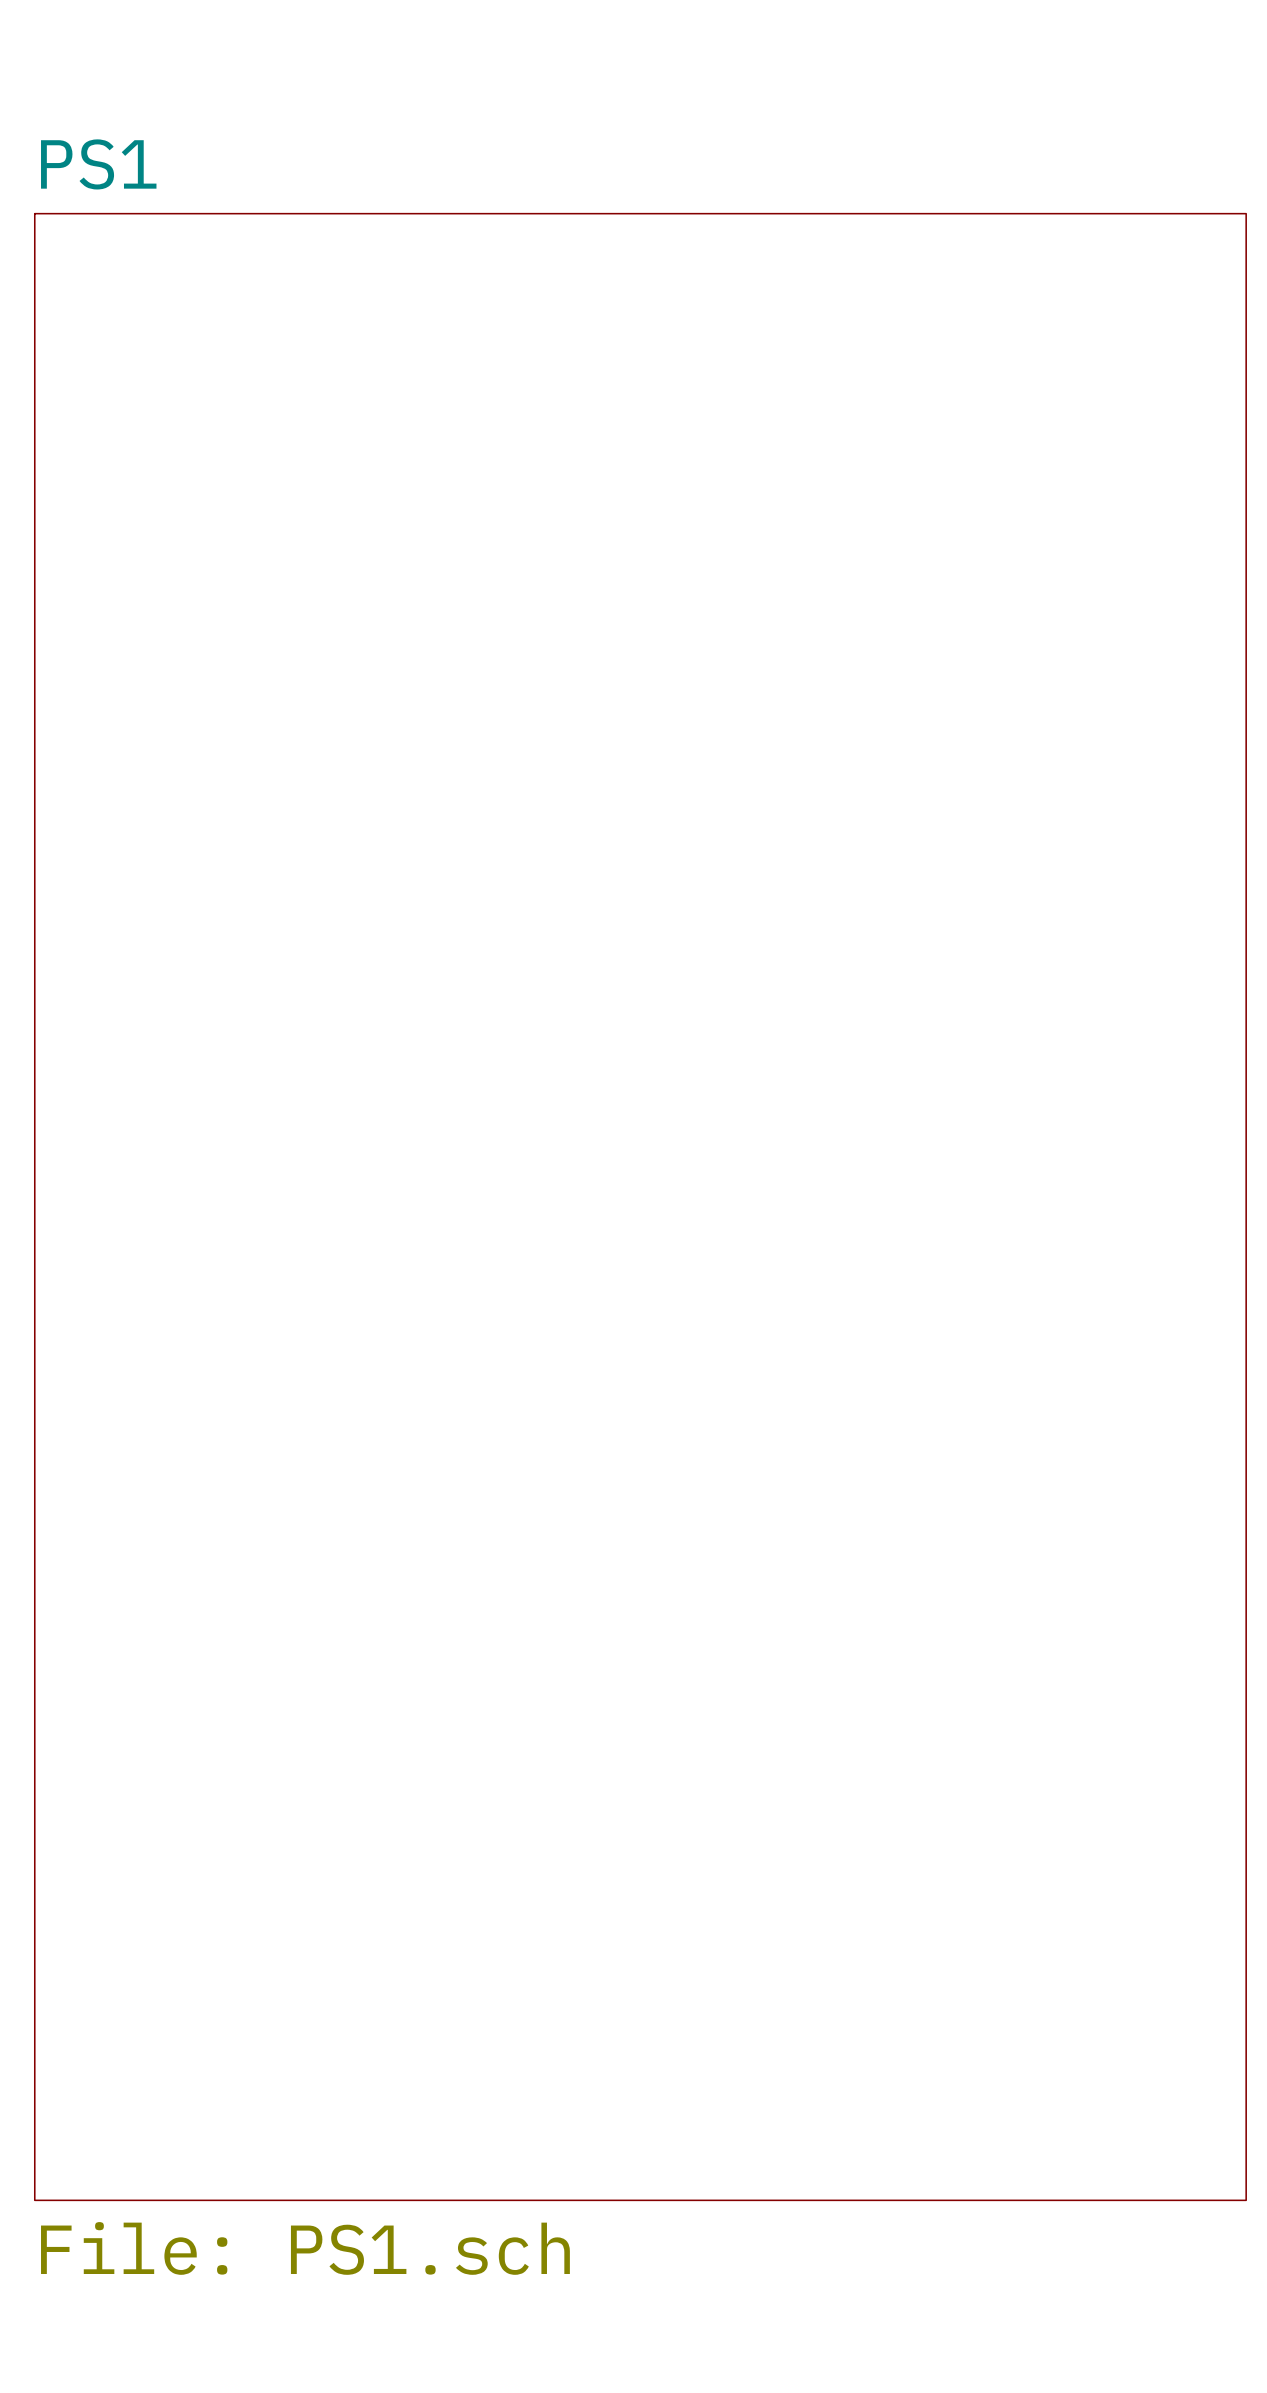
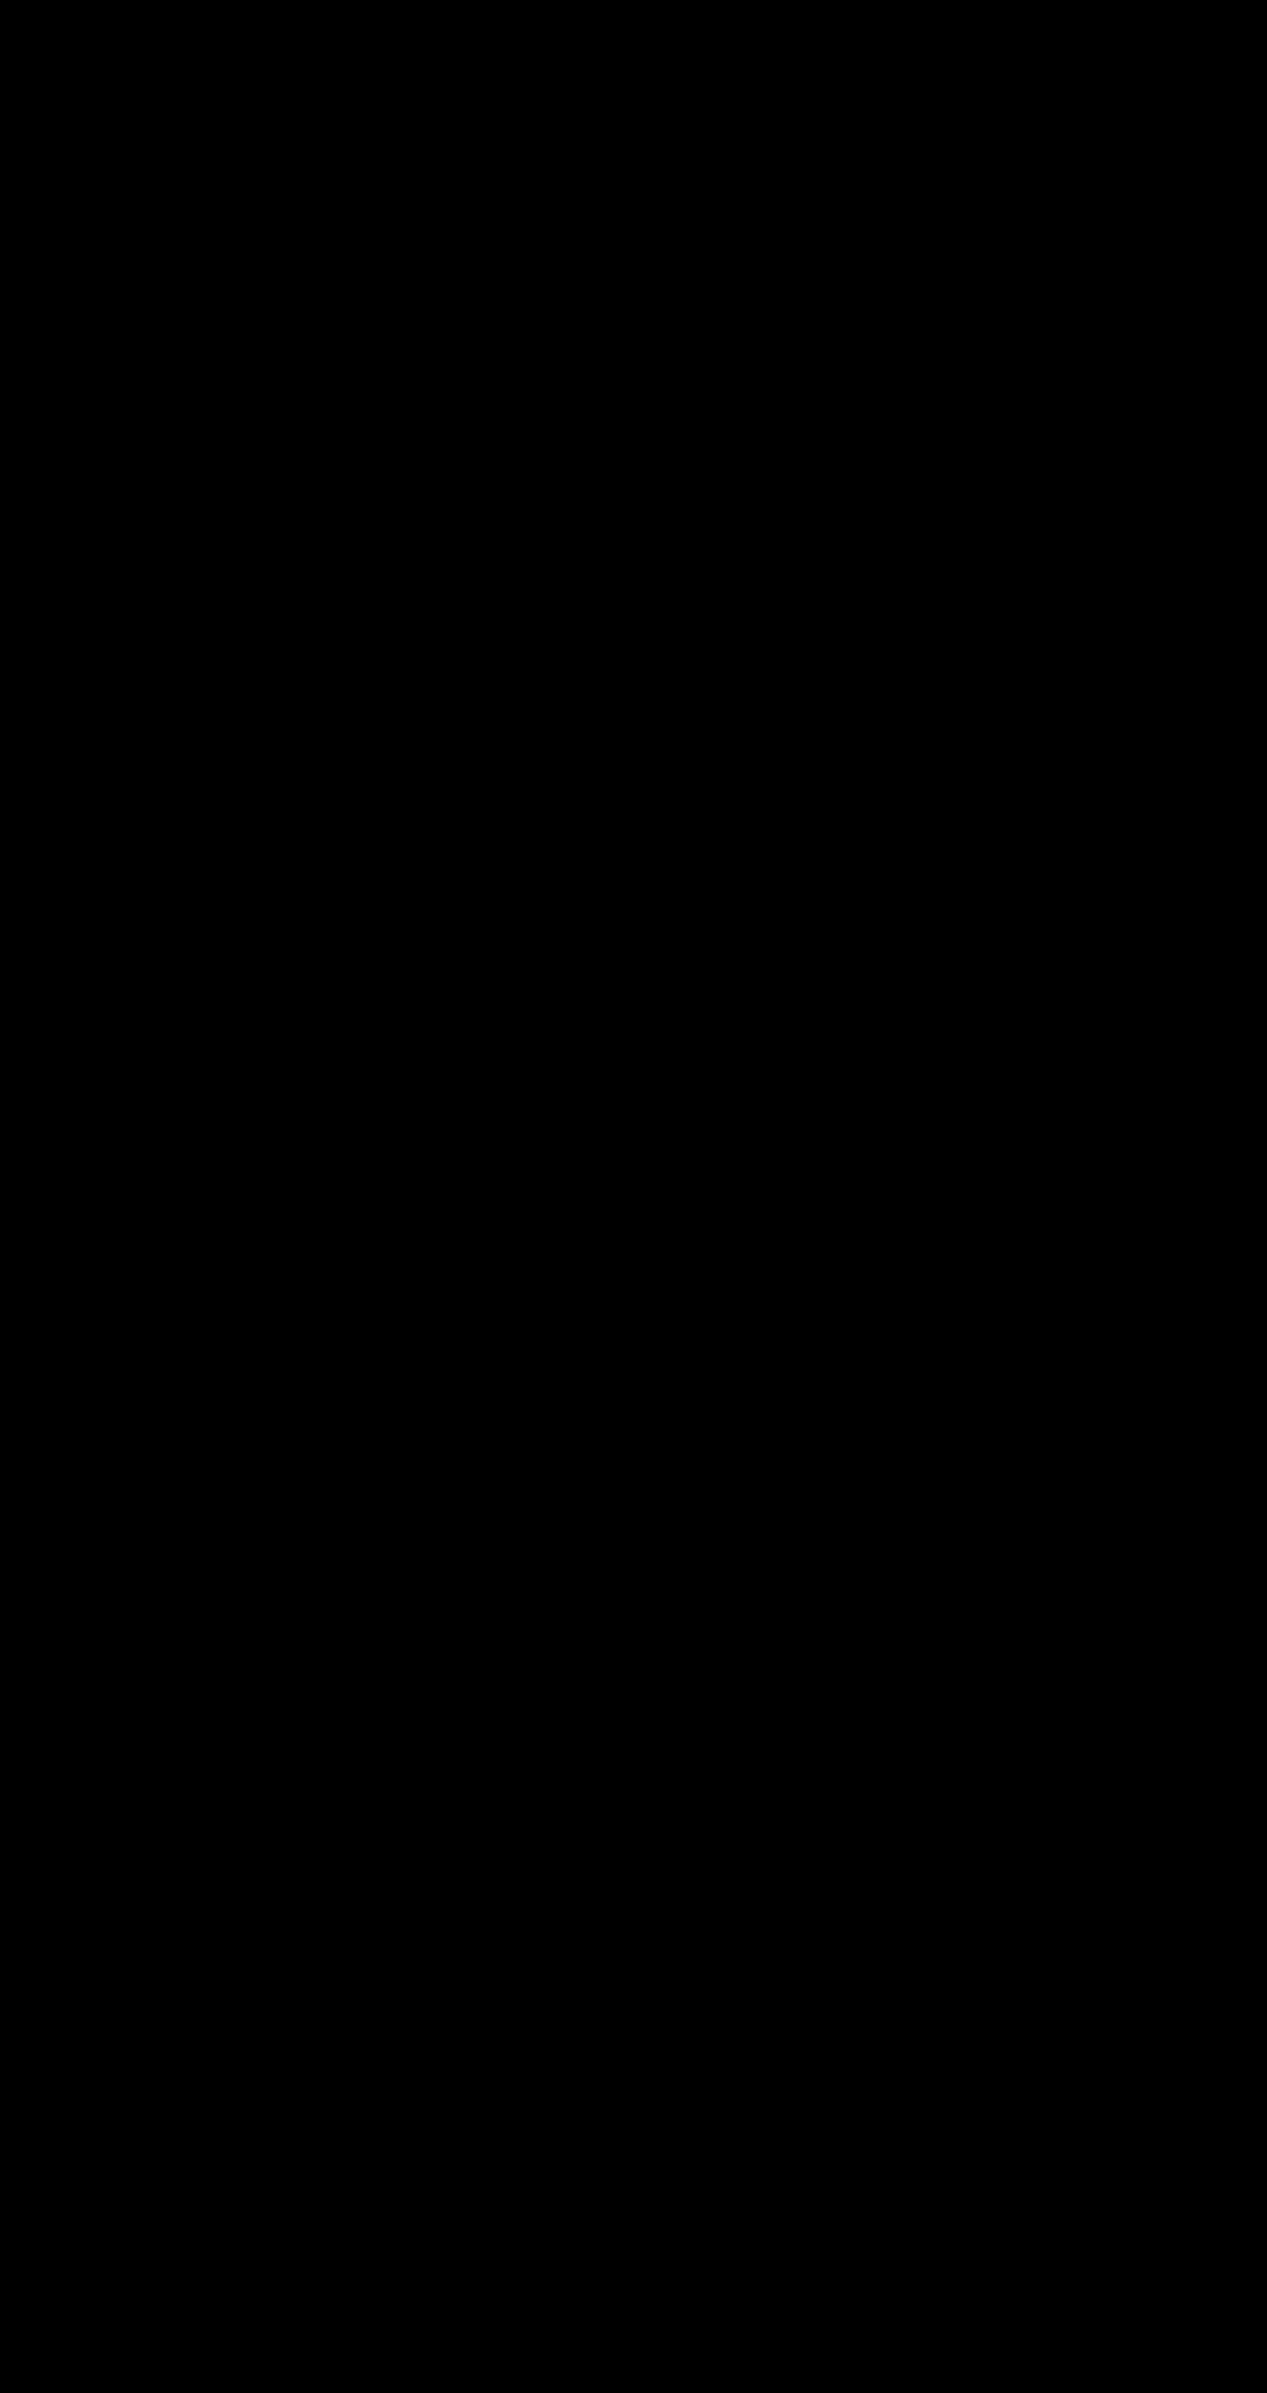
sheet PS1: File: PS1.sch (640, 1207) -> none

